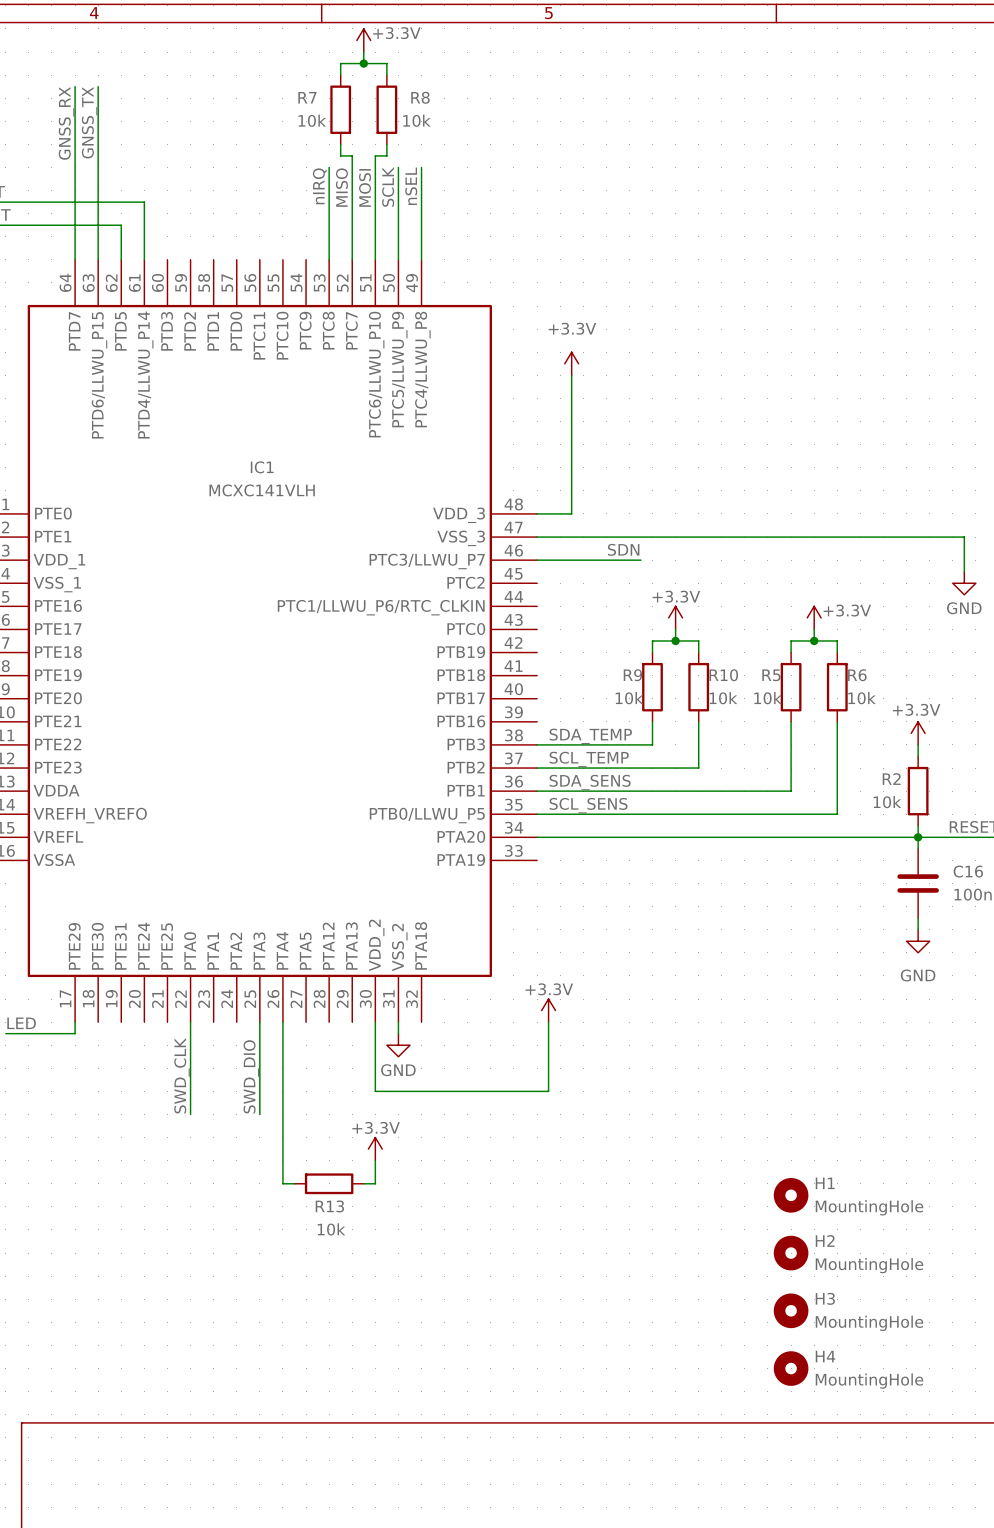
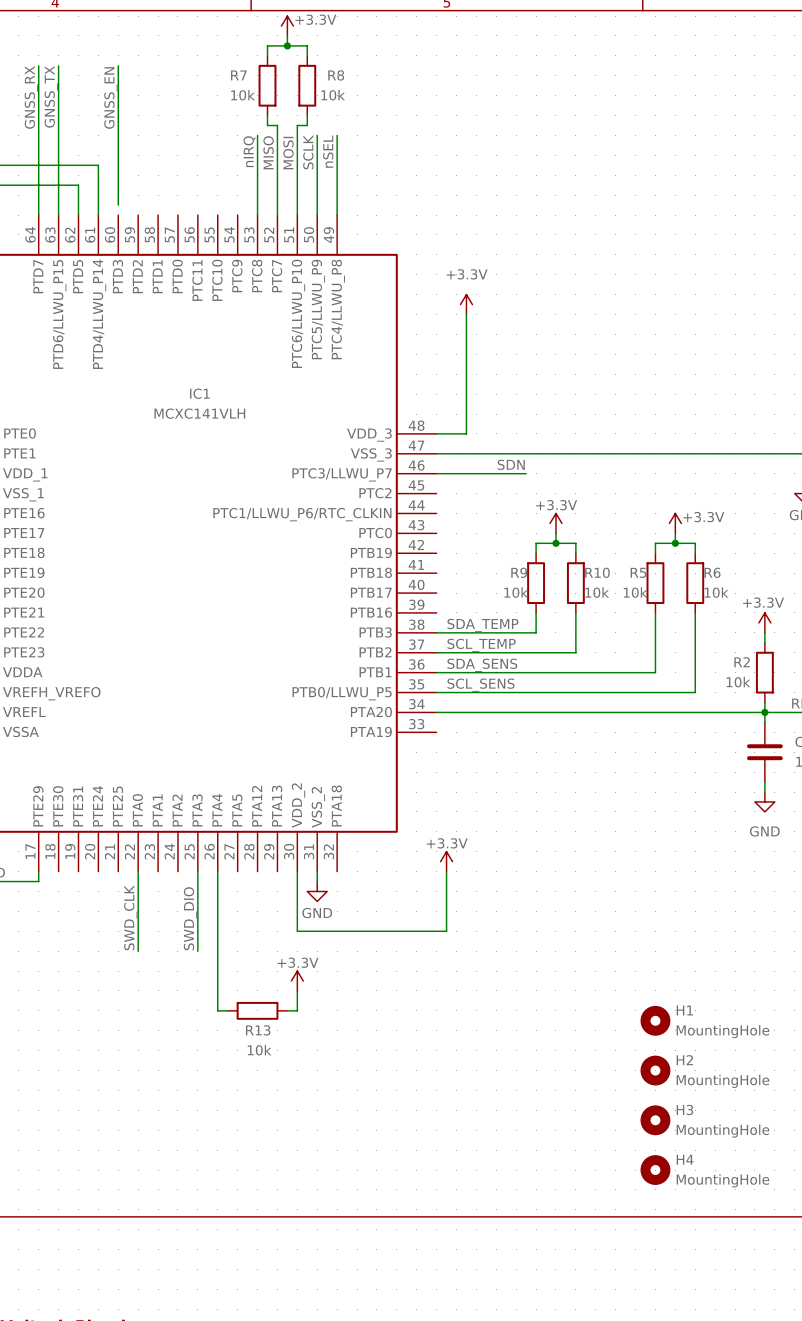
wire: none -> (118, 65) (118, 205)
label: none -> GNSS_EN (110, 97)

